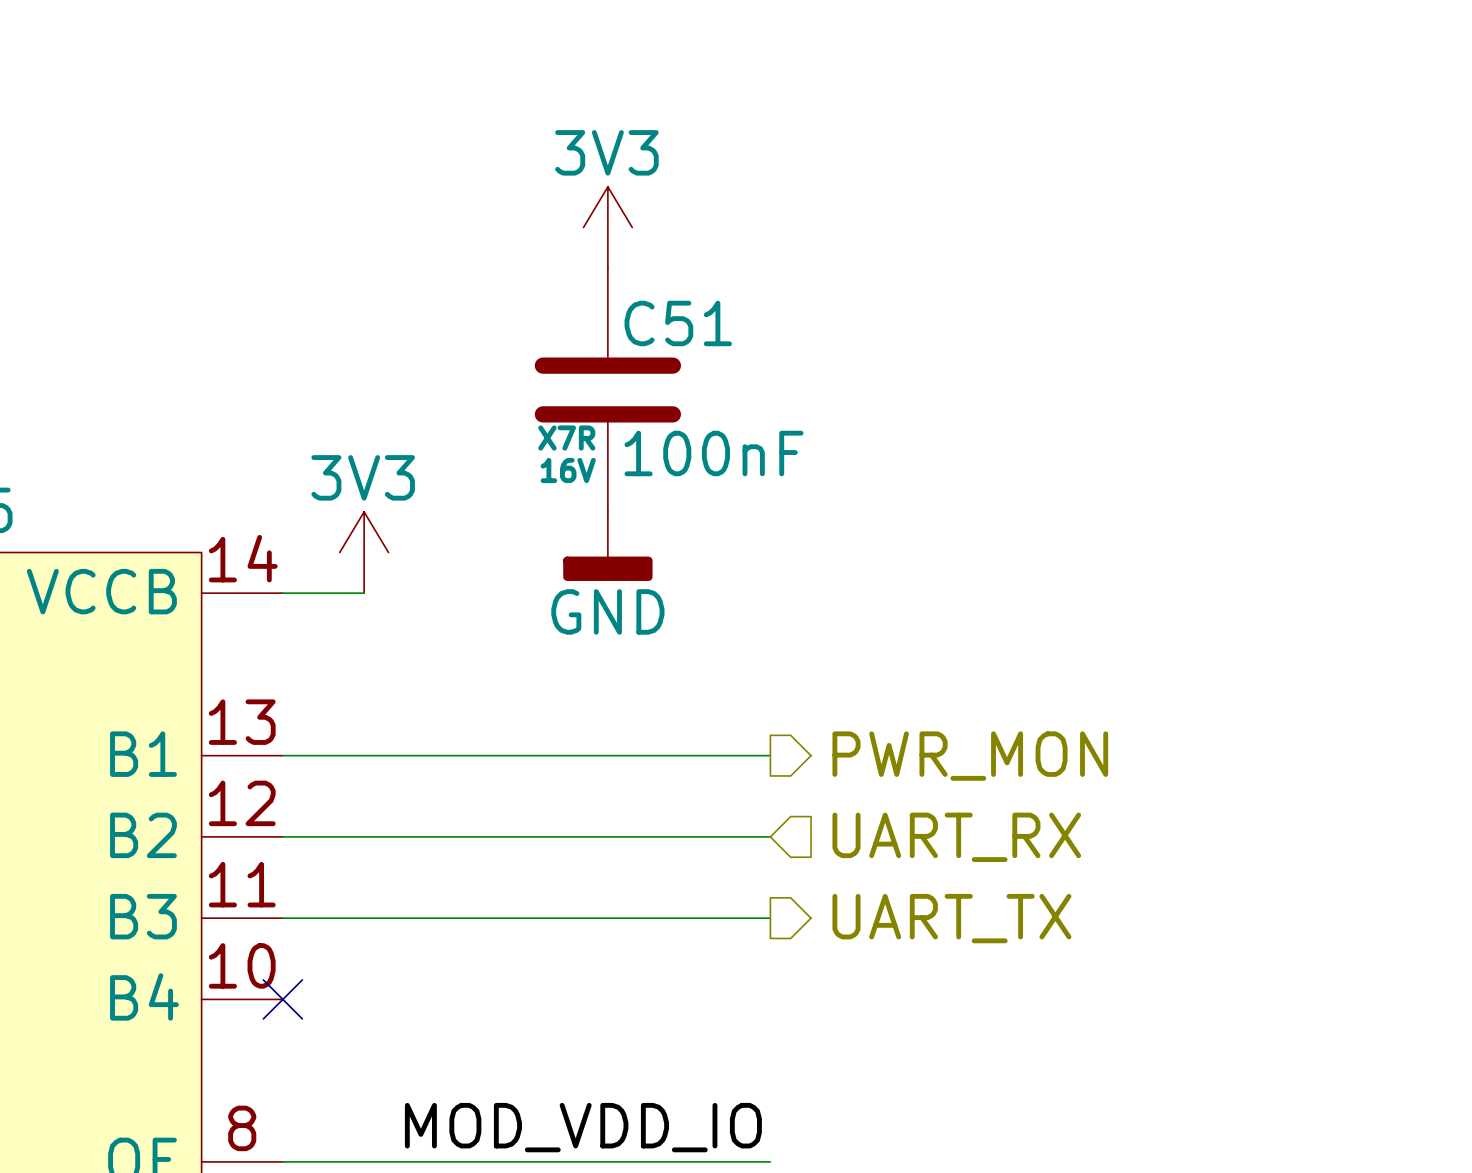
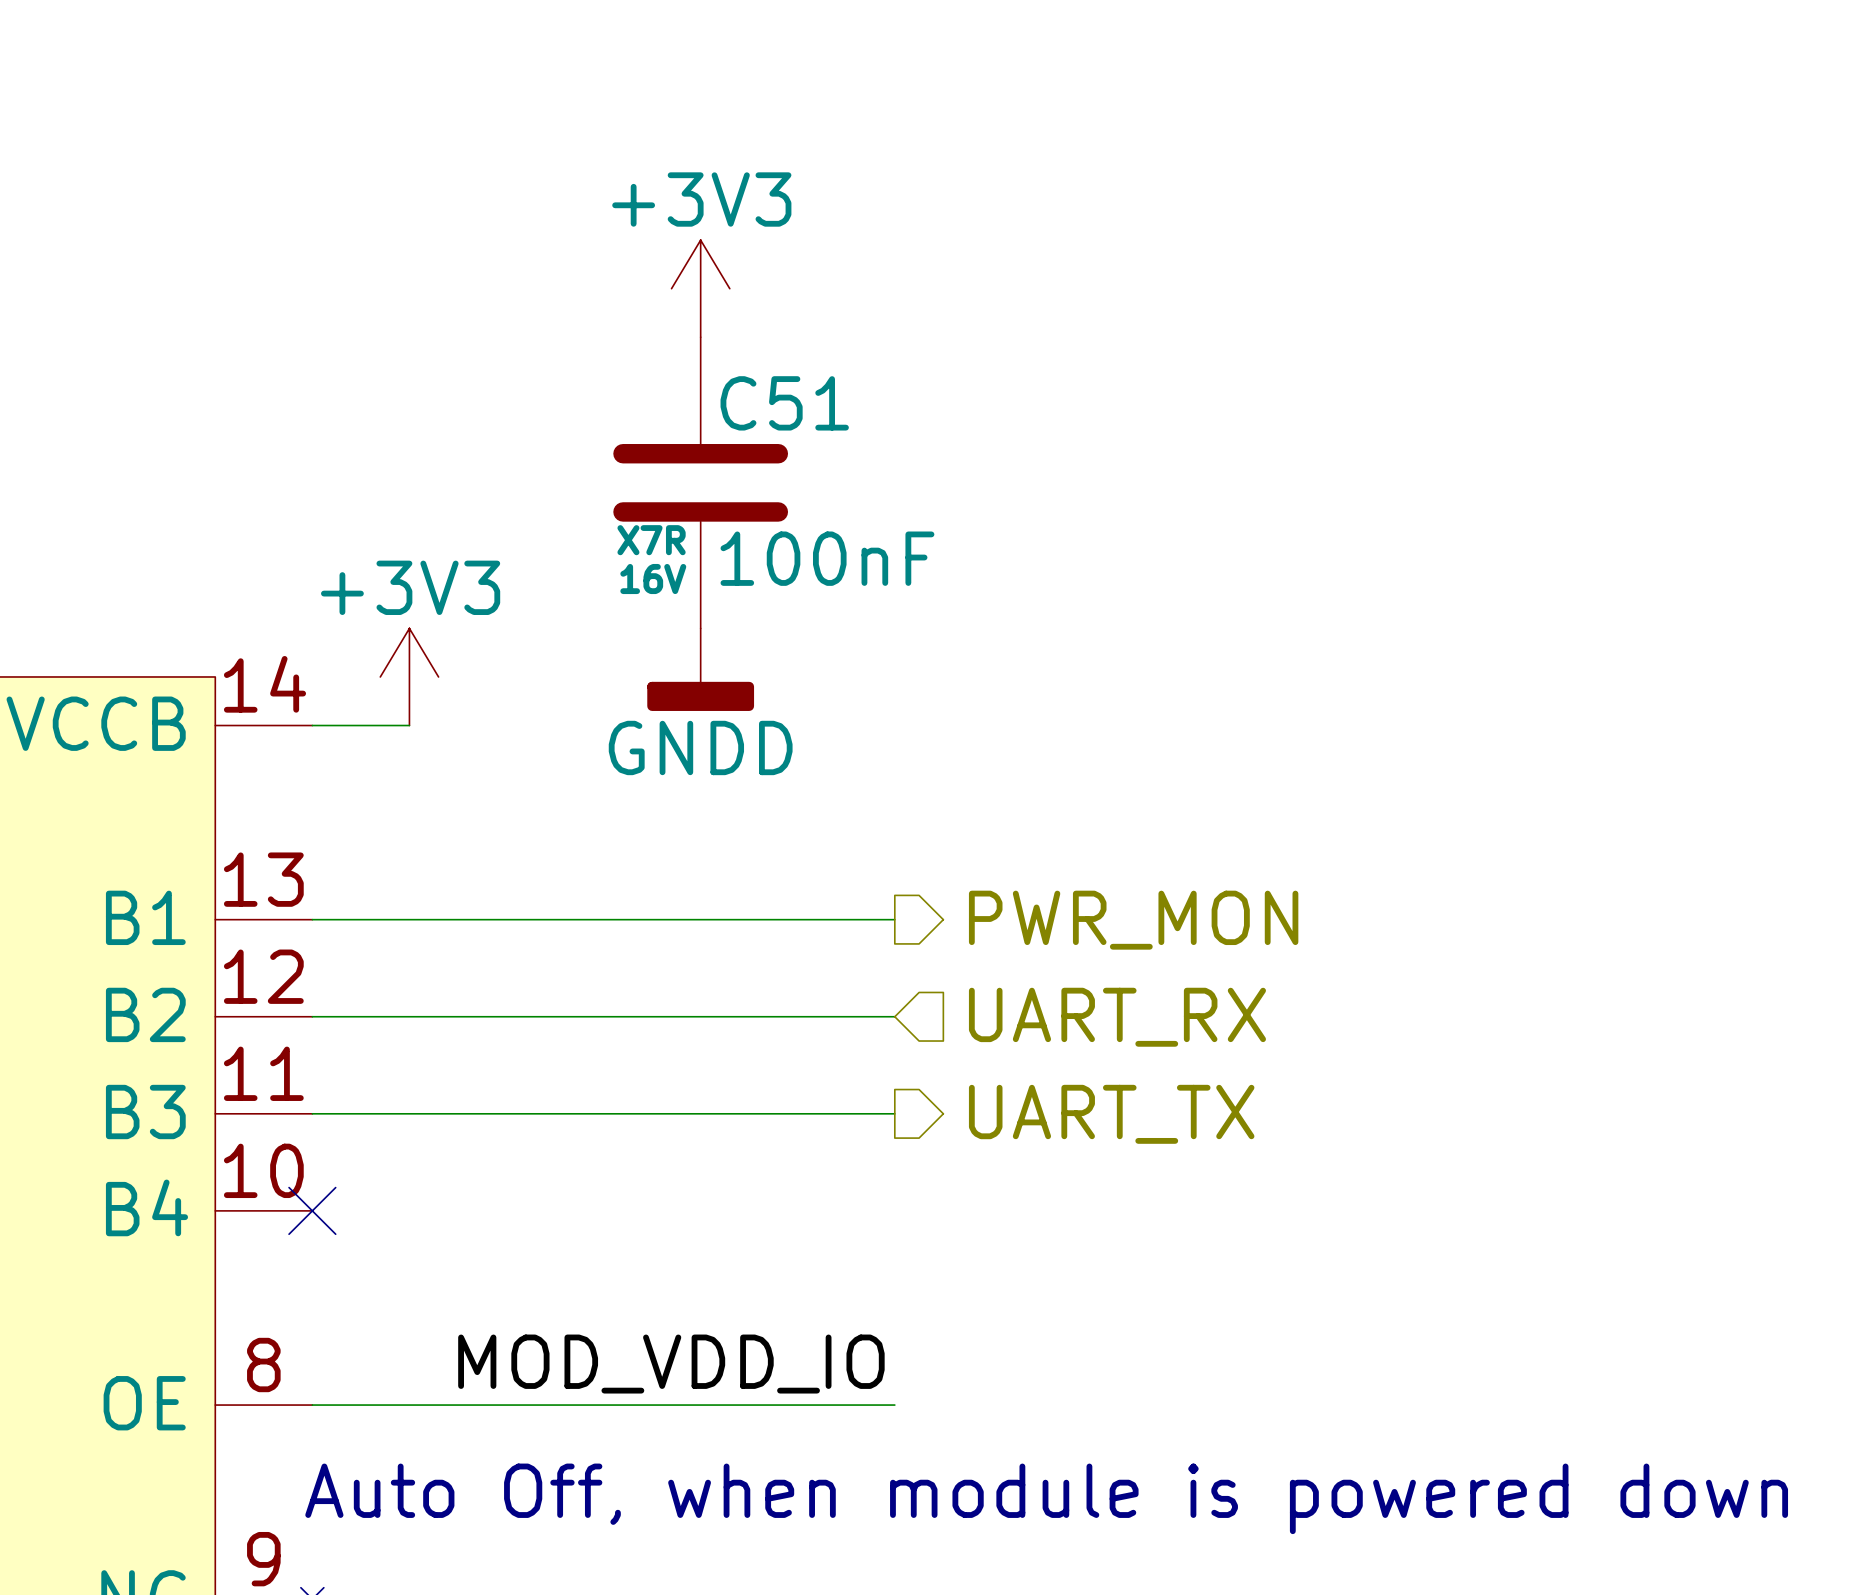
power symbol: 3V3 (607, 227) -> +3V3 (700, 288)
power symbol: GND (607, 546) -> GNDD (700, 669)
power symbol: 3V3 (364, 552) -> +3V3 (409, 676)

